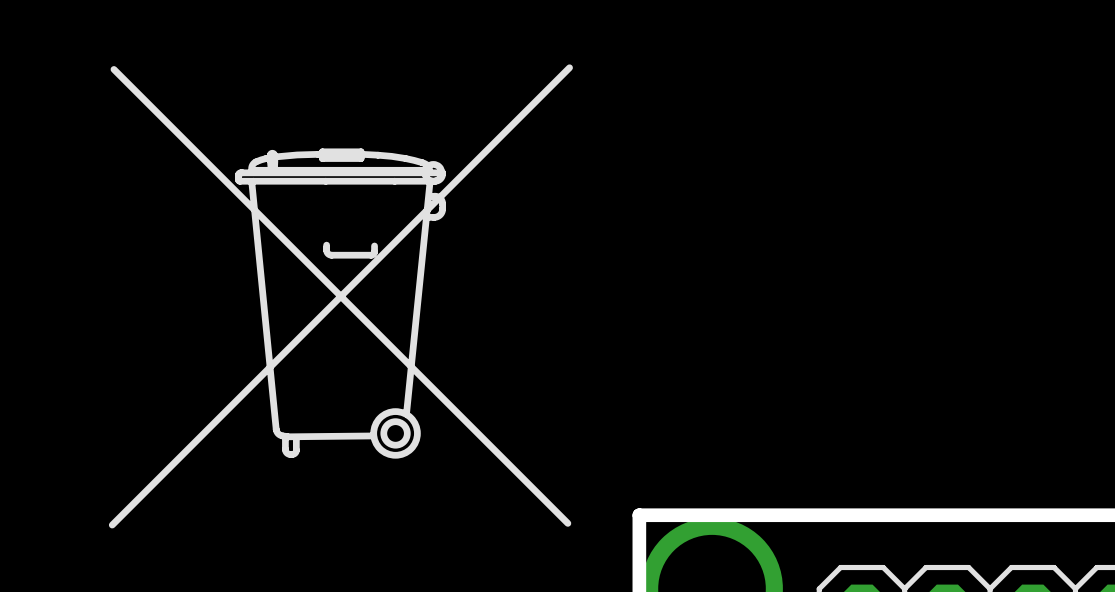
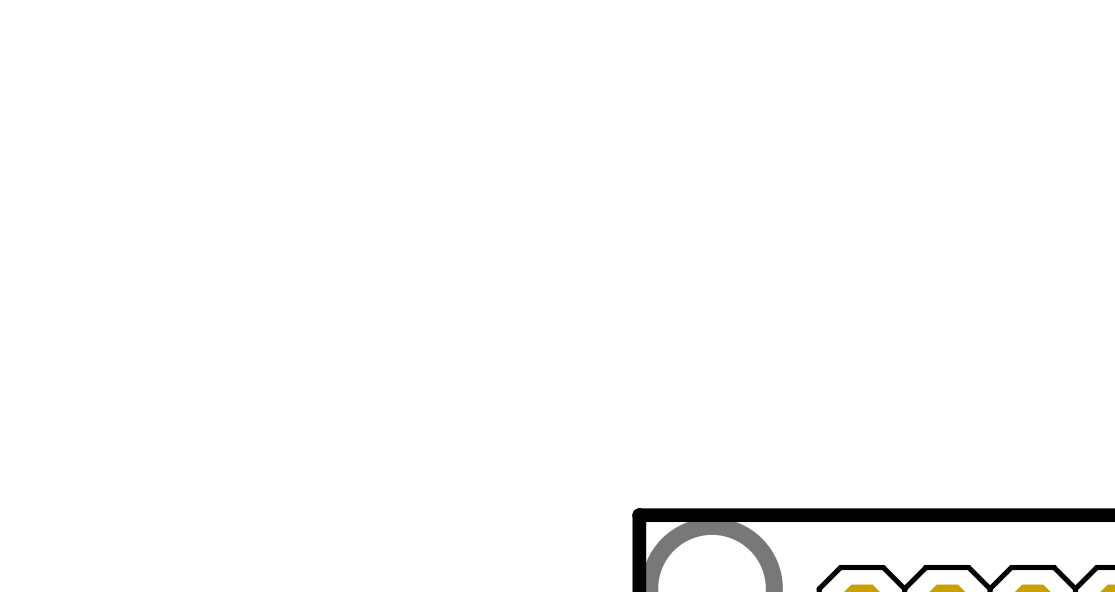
drawing: [108, 64, 573, 529] -> none

